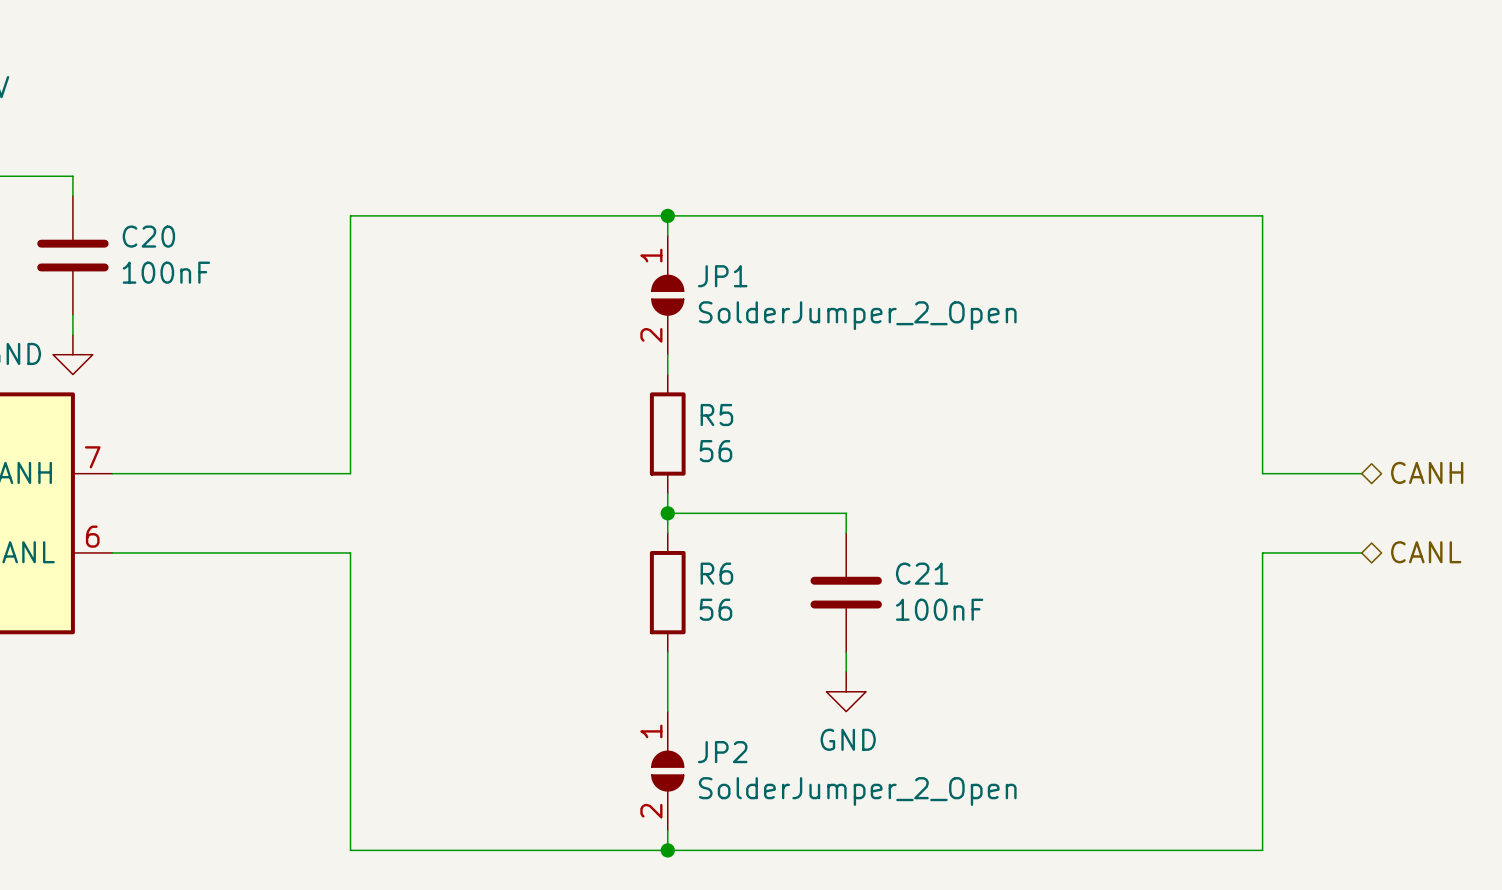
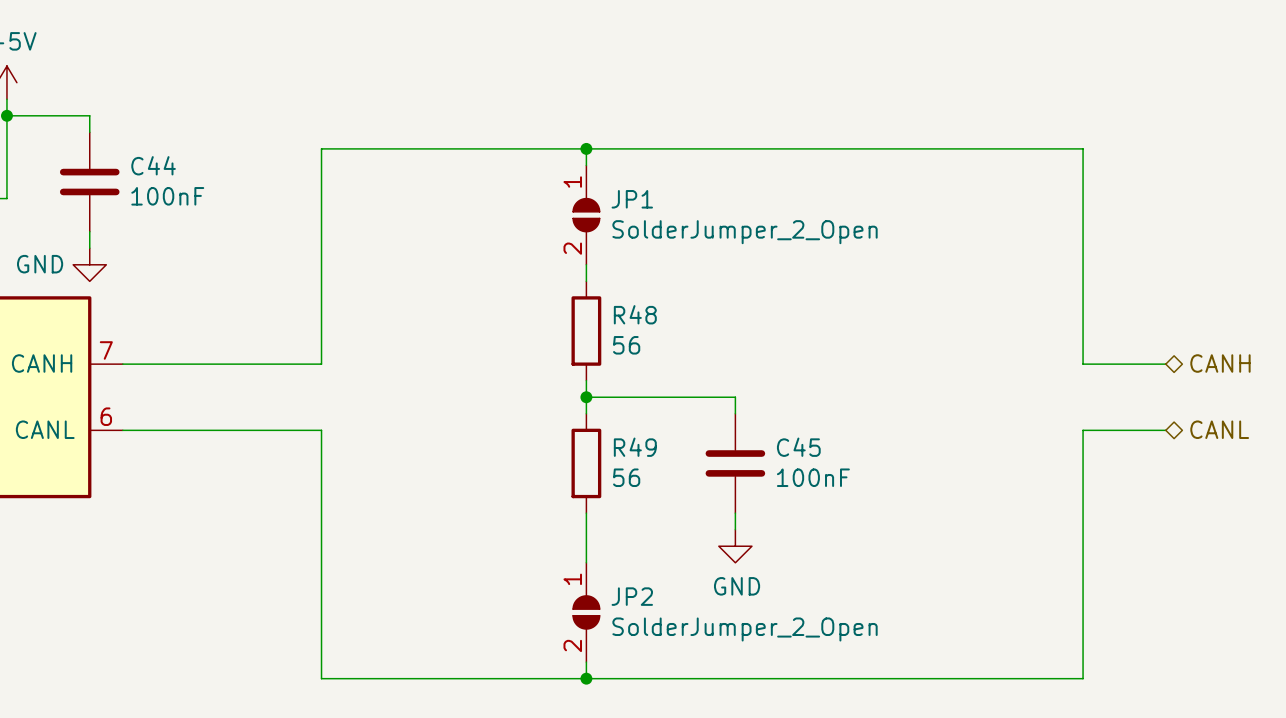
C20 name: C20 (148, 236) -> C44 (153, 165)
R5 name: R5 (716, 415) -> R48 (635, 314)
R6 name: R6 (716, 573) -> R49 (635, 447)
C21 name: C21 (922, 573) -> C45 (798, 447)

